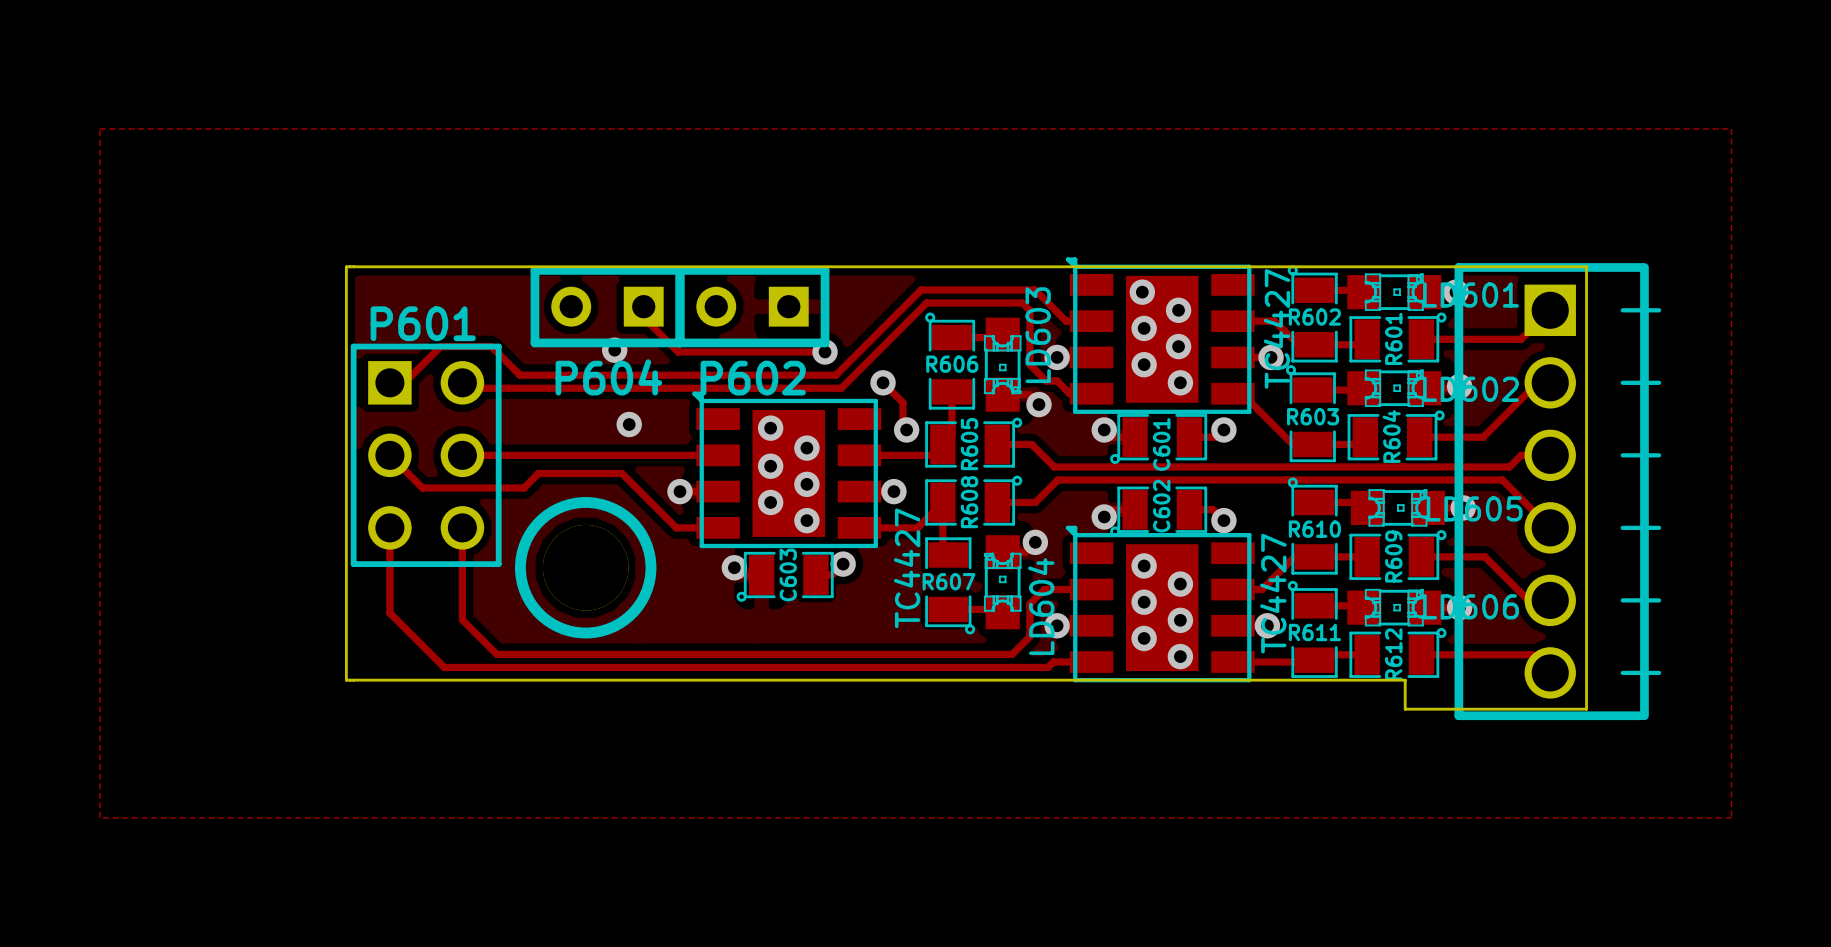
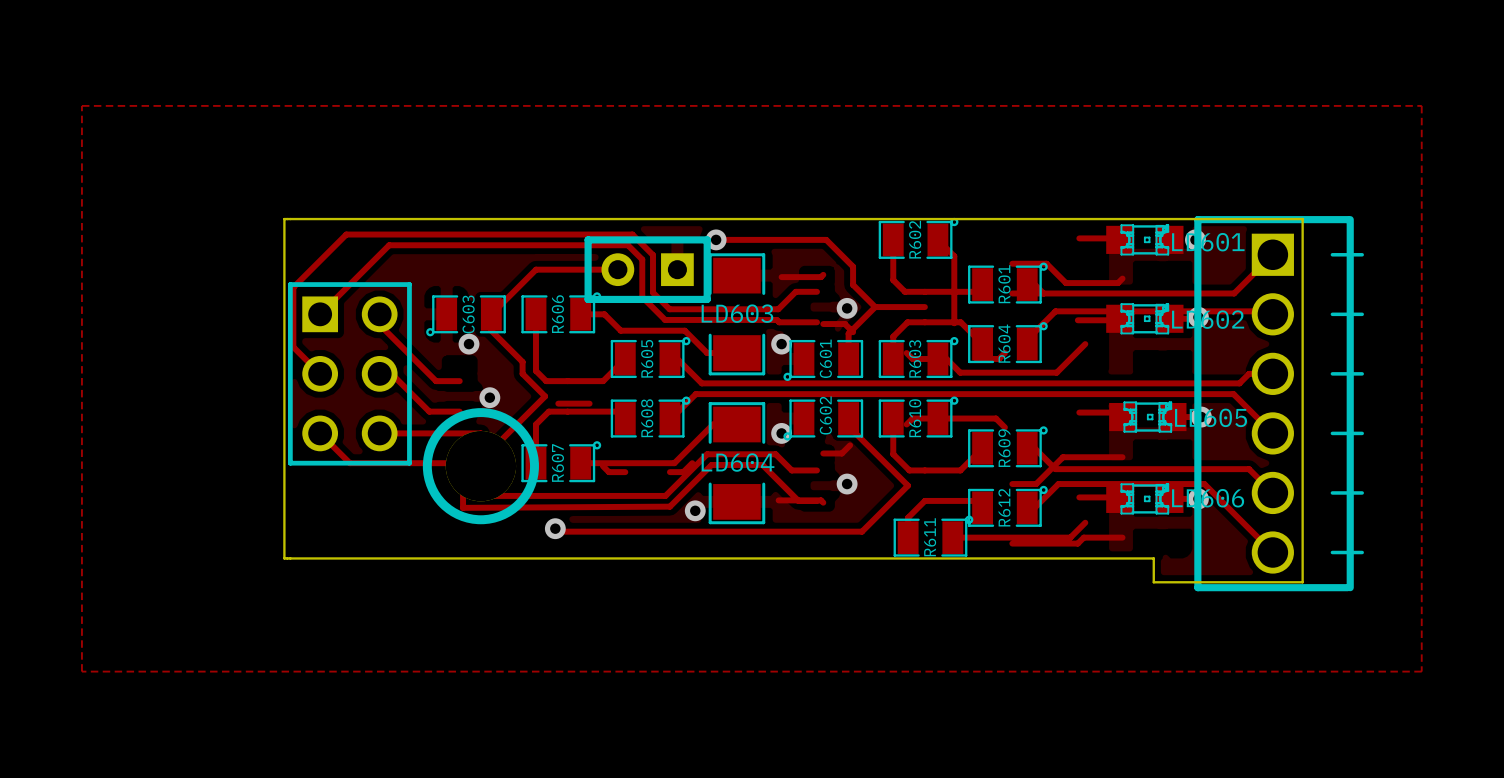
track: none -> (716, 239) (826, 239) (853, 266) (853, 284) (875, 307)
via: none -> (716, 239)
track: none -> (893, 239) (893, 280) (905, 291) (975, 291) (982, 284)
via: (1142, 292) -> none
P604: (607, 306) -> none
track: (643, 306) (643, 317) (678, 352) (825, 352) (823, 353) -> none
P602: (752, 306) -> none
via: (1178, 310) -> none
R602 rotation: 0° (1312, 313) -> 90° clockwise (918, 238)
R602 position: (1312, 313) -> (918, 238)
LD603 footprint: [983, 317, 1022, 412] -> [708, 253, 766, 376]
track: (1091, 321) (1066, 321) (1034, 289) (921, 289) (835, 375) (520, 375) (491, 346) (440, 346) (404, 382) (389, 382) -> (816, 322) (779, 322) (776, 319) (665, 319) (642, 297) (642, 259) (627, 245) (389, 245) (320, 314)
P601 name: P601 (423, 323) -> none
track: none -> (608, 269) (535, 269) (491, 314) (491, 330) (522, 361) (522, 373) (545, 396) (501, 439) (501, 475)
part: none -> (647, 269)
via: (1144, 328) -> none
part: TC4427 (1160, 335) -> none
R601 position: (1397, 337) -> (1007, 283)
track: (1421, 339) (1521, 339) -> (1027, 284) (1034, 284) (1043, 293) (1234, 293) (1249, 278)
via: (1178, 346) -> none
via: (614, 350) -> none
via: (825, 352) -> none
via: (1057, 357) -> none
via: (1271, 357) -> none
R606 rotation: 0° (950, 361) -> 90° clockwise (561, 312)
R606 position: (950, 361) -> (561, 312)
via: (1144, 364) -> none
track: none -> (875, 307) (924, 307)
track: none -> (875, 307) (848, 333) (848, 358)
via: none -> (847, 308)
track: (462, 382) (467, 388) (841, 388) (926, 303) (1022, 303) (1029, 310) (1029, 364) (1046, 381) (1057, 381) (1069, 393) (1091, 393) -> (379, 314) (379, 324) (436, 381) (459, 381)
track: none -> (535, 314) (535, 370) (546, 381) (603, 381) (625, 358)
track: none -> (580, 314) (604, 314) (620, 330) (684, 330) (707, 353) (736, 353)
track: (883, 382) (903, 402) (903, 426) (906, 429) -> none
via: (883, 382) -> none
via: (1180, 382) -> none
track: (1550, 382) (1537, 382) (1483, 437) (1419, 437) -> (1272, 314) (1269, 311) (1055, 311) (1027, 339) (1027, 344)
track: (951, 391) (951, 435) (932, 455) (859, 455) -> none
track: (1232, 393) (1242, 393) (1292, 444) (1358, 444) (1365, 437) -> none
via: (1038, 404) -> none
R603 rotation: 0° (1310, 413) -> 90° clockwise (918, 357)
R603 position: (1310, 413) -> (918, 357)
via: none -> (469, 344)
via: none -> (781, 344)
track: none -> (982, 344) (960, 322) (907, 322) (893, 336) (893, 358)
track: none -> (1085, 344) (1056, 372) (960, 372) (946, 358) (937, 358)
via: (629, 424) -> none
via: (770, 428) -> none
via: (906, 429) -> none
via: (1104, 429) -> none
via: (1223, 429) -> none
R604 position: (1396, 435) -> (1007, 342)
C601 position: (1158, 439) -> (823, 360)
R605 position: (973, 442) -> (650, 357)
track: (997, 444) (1031, 444) (1054, 466) -> (669, 358) (677, 358) (701, 383) (865, 383)
C601 name position: C601 (1161, 444) -> C601 (825, 358)
via: (806, 448) -> none
track: (389, 455) (422, 487) (524, 487) (538, 473) (621, 473) (676, 527) (718, 527) -> (320, 373) (293, 347) (293, 287) (346, 234) (632, 234) (653, 255) (653, 292) (669, 309) (778, 309) (795, 291) (816, 291)
track: (476, 455) (718, 455) -> (391, 373) (429, 411) (459, 411)
via: (770, 466) -> none
part: TC4427 (786, 469) -> none
track: (1057, 480) (1035, 502) (997, 502) -> (868, 394) (695, 394) (669, 418)
via: none -> (489, 397)
via: (806, 484) -> none
via: (679, 491) -> none
via: (893, 491) -> none
R608 position: (973, 500) -> (650, 417)
via: (770, 502) -> none
track: none -> (625, 418) (618, 411) (548, 411) (535, 424) (535, 463)
track: none -> (848, 418) (848, 426) (907, 485) (862, 531) (558, 531) (555, 528)
track: none -> (893, 418) (893, 454) (909, 470) (960, 470) (982, 448)
track: none -> (937, 418) (976, 418)
C602 position: (1158, 511) -> (823, 420)
track: none -> (736, 424) (713, 424) (674, 463) (580, 463)
via: (1104, 516) -> none
via: (806, 520) -> none
via: (1223, 520) -> none
R610 rotation: 0° (1312, 526) -> 90° clockwise (918, 417)
R610 position: (1312, 526) -> (918, 417)
track: (389, 527) (389, 613) (444, 667) (1048, 667) (1053, 662) (1091, 662) -> (320, 433) (349, 463) (463, 463) (463, 507) (669, 506) (711, 464) (762, 464) (798, 500) (816, 500)
track: (462, 527) (462, 619) (496, 654) (1012, 654) (1029, 636) (1029, 604) (1044, 589) (1091, 589) -> (379, 433) (480, 433) (480, 495) (665, 495) (707, 454) (775, 454) (791, 470) (816, 470)
track: (859, 527) (917, 527) (942, 502) (942, 549) (948, 555) -> none
via: none -> (781, 433)
LD604 footprint: [983, 535, 1022, 630] -> [708, 402, 766, 525]
via: (1035, 542) -> none
R609 position: (1397, 555) -> (1007, 446)
track: (1421, 556) (1484, 556) (1528, 600) (1550, 600) -> (1027, 448) (1034, 448) (1055, 469) (1249, 469) (1272, 492)
via: (843, 564) -> none
via: (1144, 565) -> none
via: (734, 567) -> none
C603 position: (785, 576) -> (466, 315)
via: (1180, 584) -> none
R607 rotation: 0° (950, 585) -> 90° counterclockwise (561, 461)
R607 position: (950, 585) -> (561, 461)
via: none -> (847, 484)
via: (1144, 602) -> none
part: TC4427 (1160, 604) -> none
track: none -> (982, 507) (975, 500) (924, 500) (908, 517) (908, 537)
via: (1180, 620) -> none
via: none -> (695, 510)
via: (1057, 625) -> none
via: (1267, 625) -> none
R611 rotation: 0° (1312, 629) -> 90° clockwise (933, 536)
R611 position: (1312, 629) -> (933, 536)
track: none -> (1085, 522) (1070, 537) (952, 537)
via: (1144, 638) -> none
via: none -> (555, 528)
R612 position: (1397, 652) -> (1007, 506)
track: (1421, 654) (1532, 654) -> (1027, 507) (1034, 507) (1058, 484) (1204, 484) (1257, 537)
via: (1180, 656) -> none

